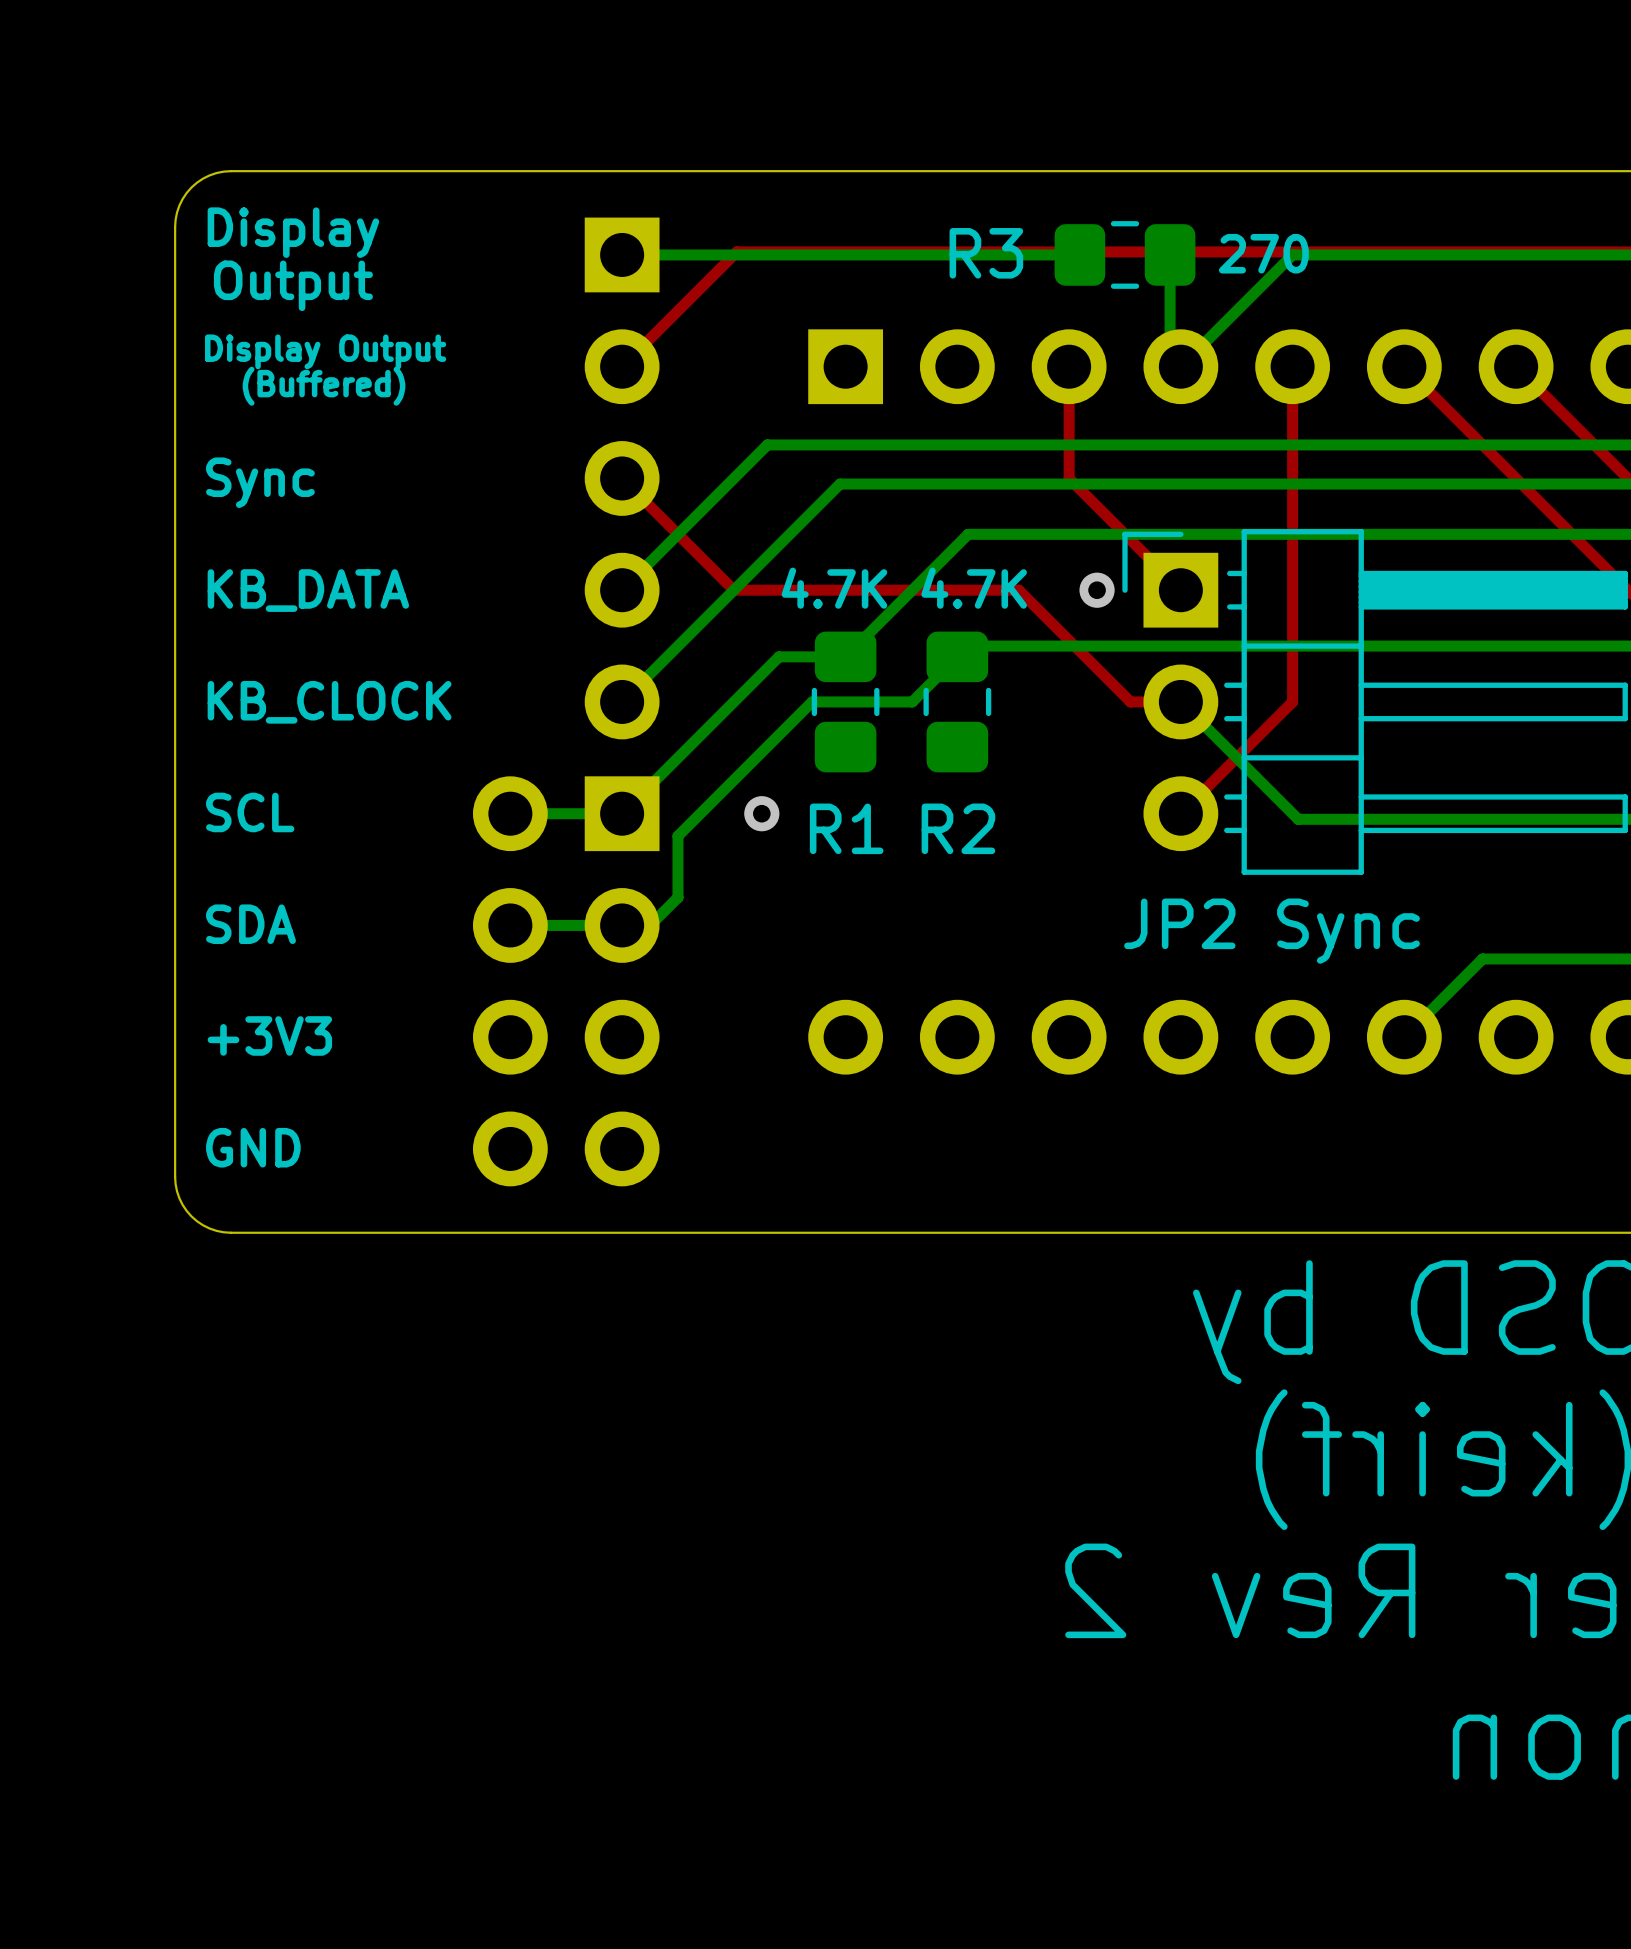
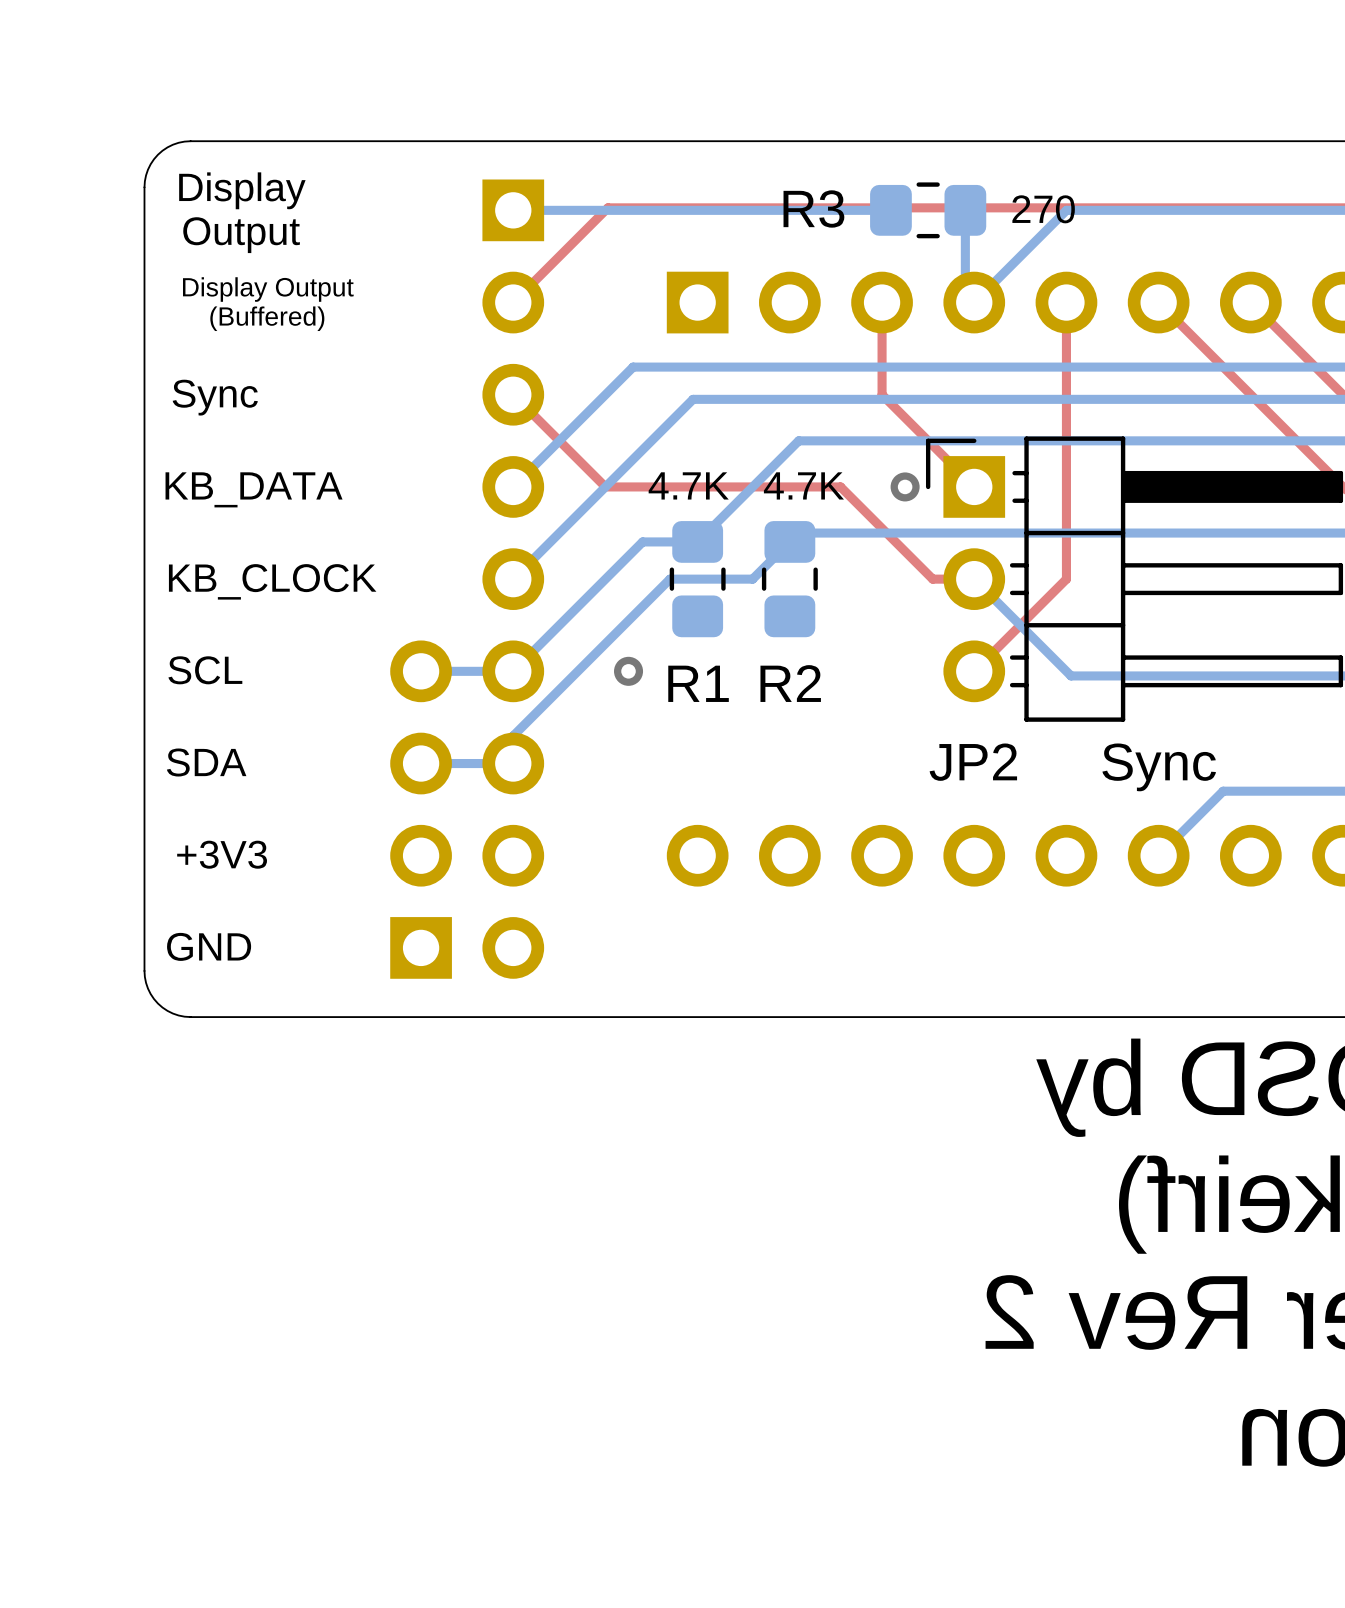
part: none -> (513, 579)
bottom track: (678, 836) (678, 897) (650, 925) (622, 925) -> (559, 689) (513, 735) (513, 763)
text position: Sync (1348, 931) -> Sync (1159, 767)
part: none -> (421, 809)
part: (566, 981) -> none

